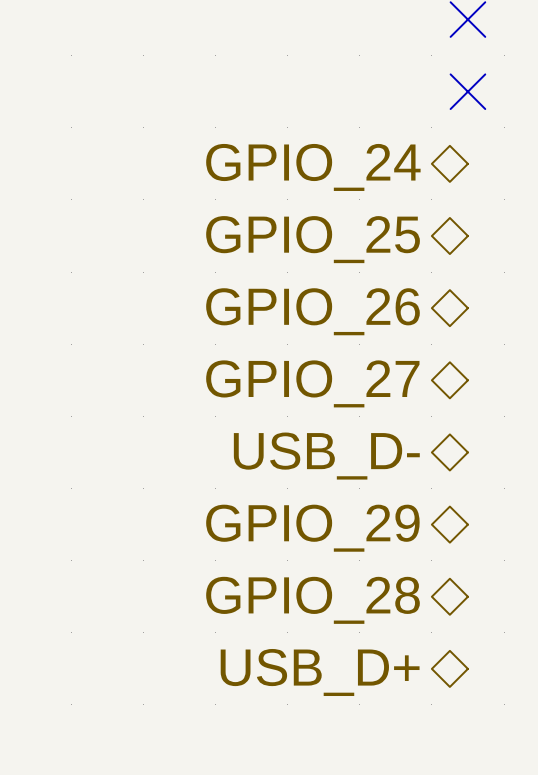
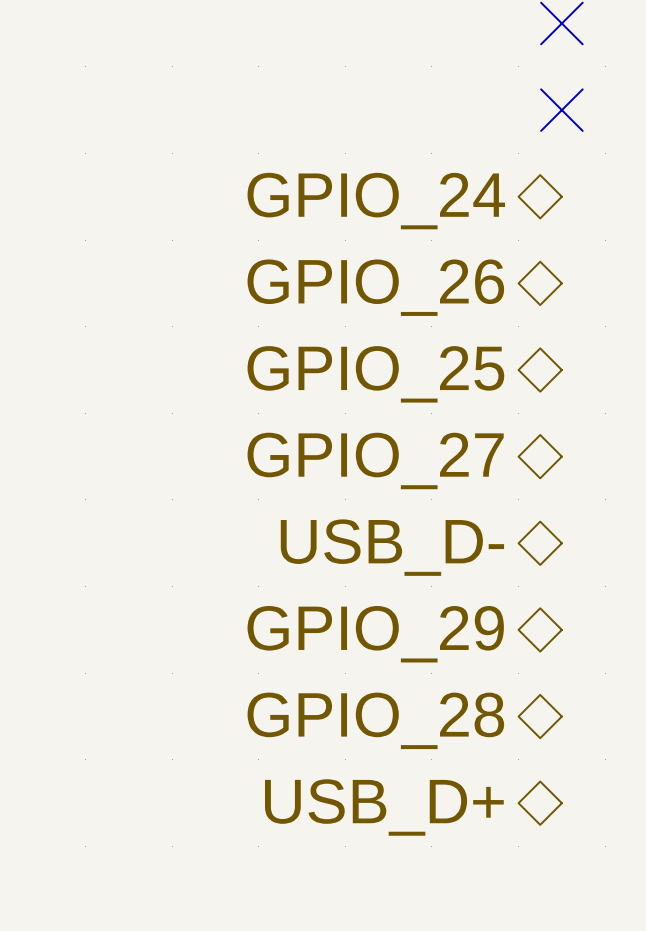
hierarchical label: GPIO_25 (313, 239) -> GPIO_26 (375, 287)
hierarchical label: GPIO_26 (312, 311) -> GPIO_25 (375, 374)

